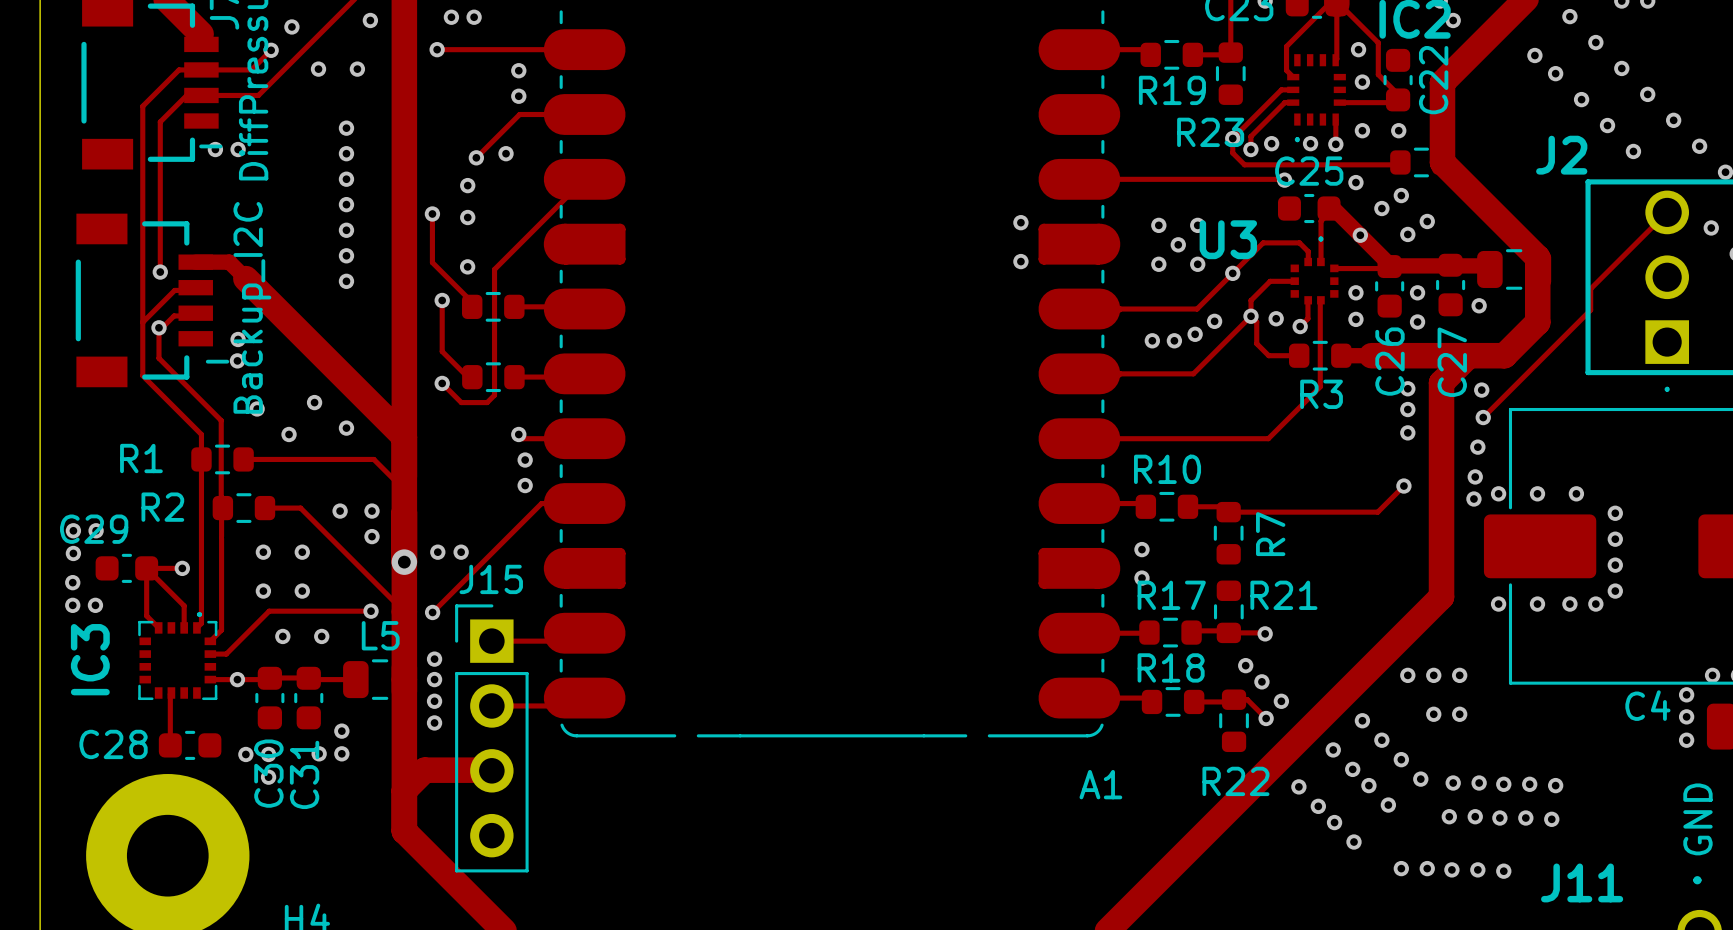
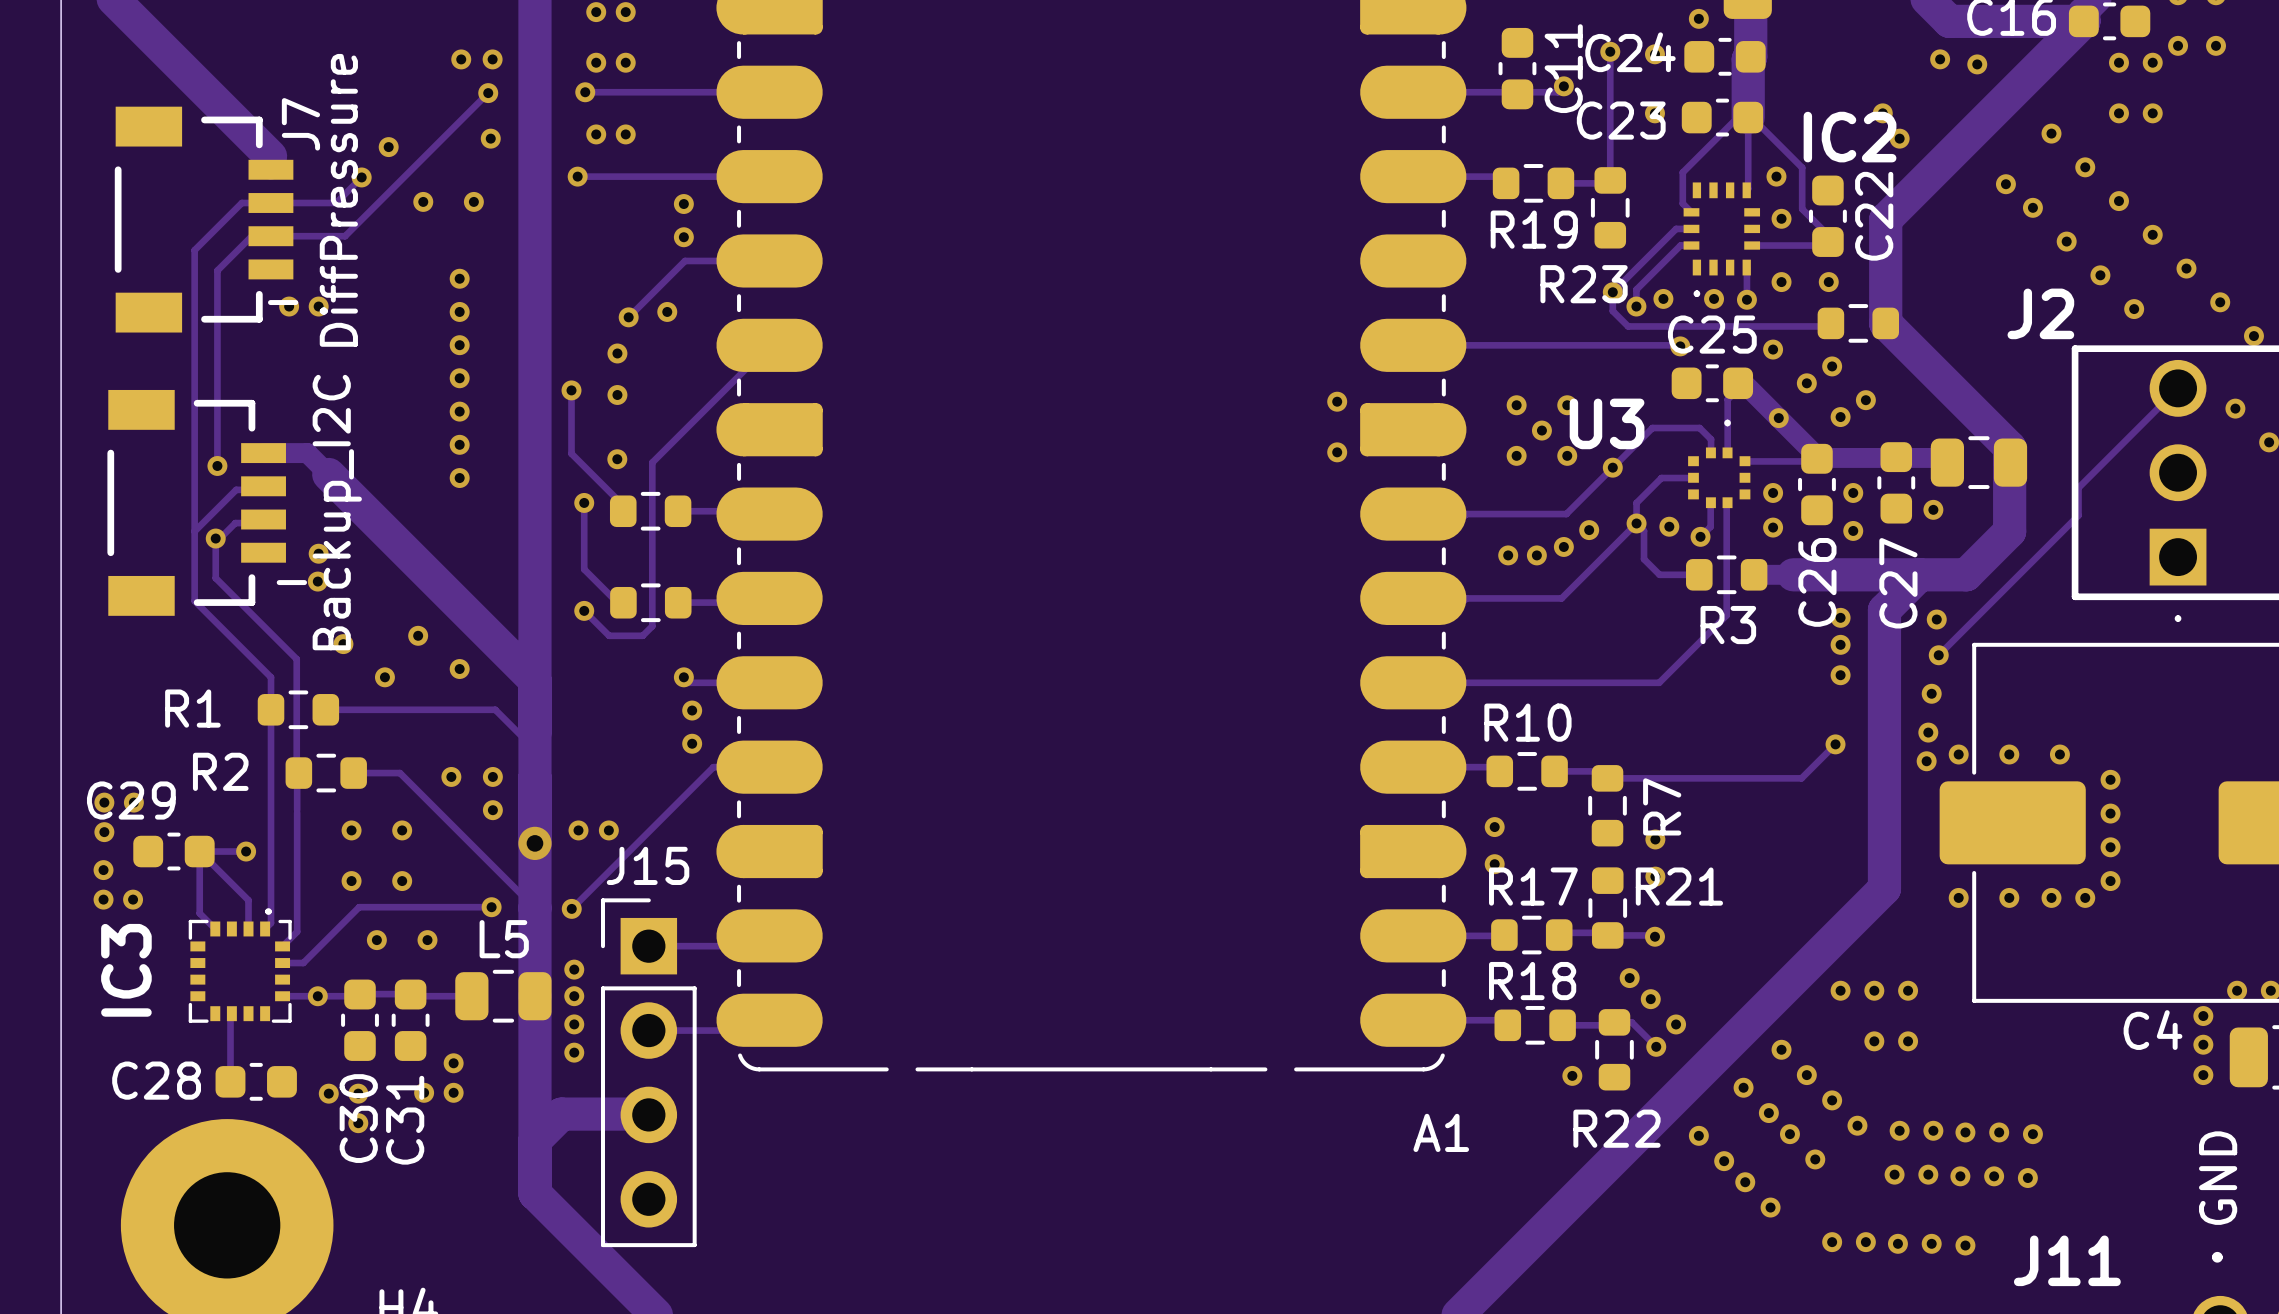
via: none -> (1655, 839)
via: none -> (1655, 876)
via: none -> (1572, 1075)

